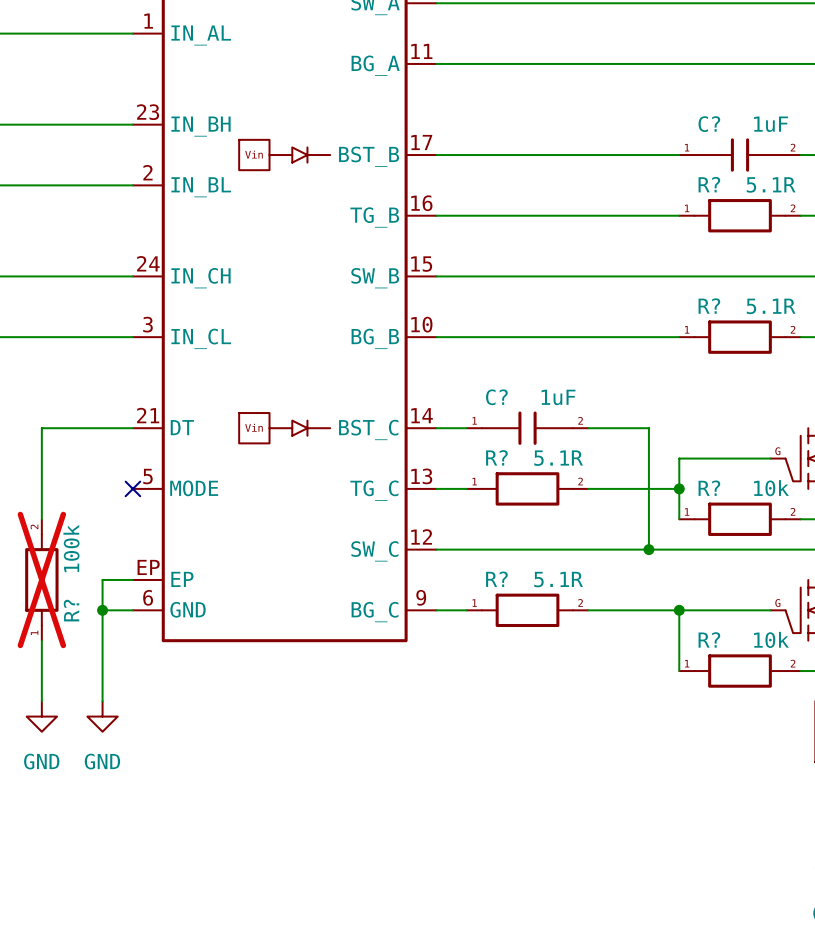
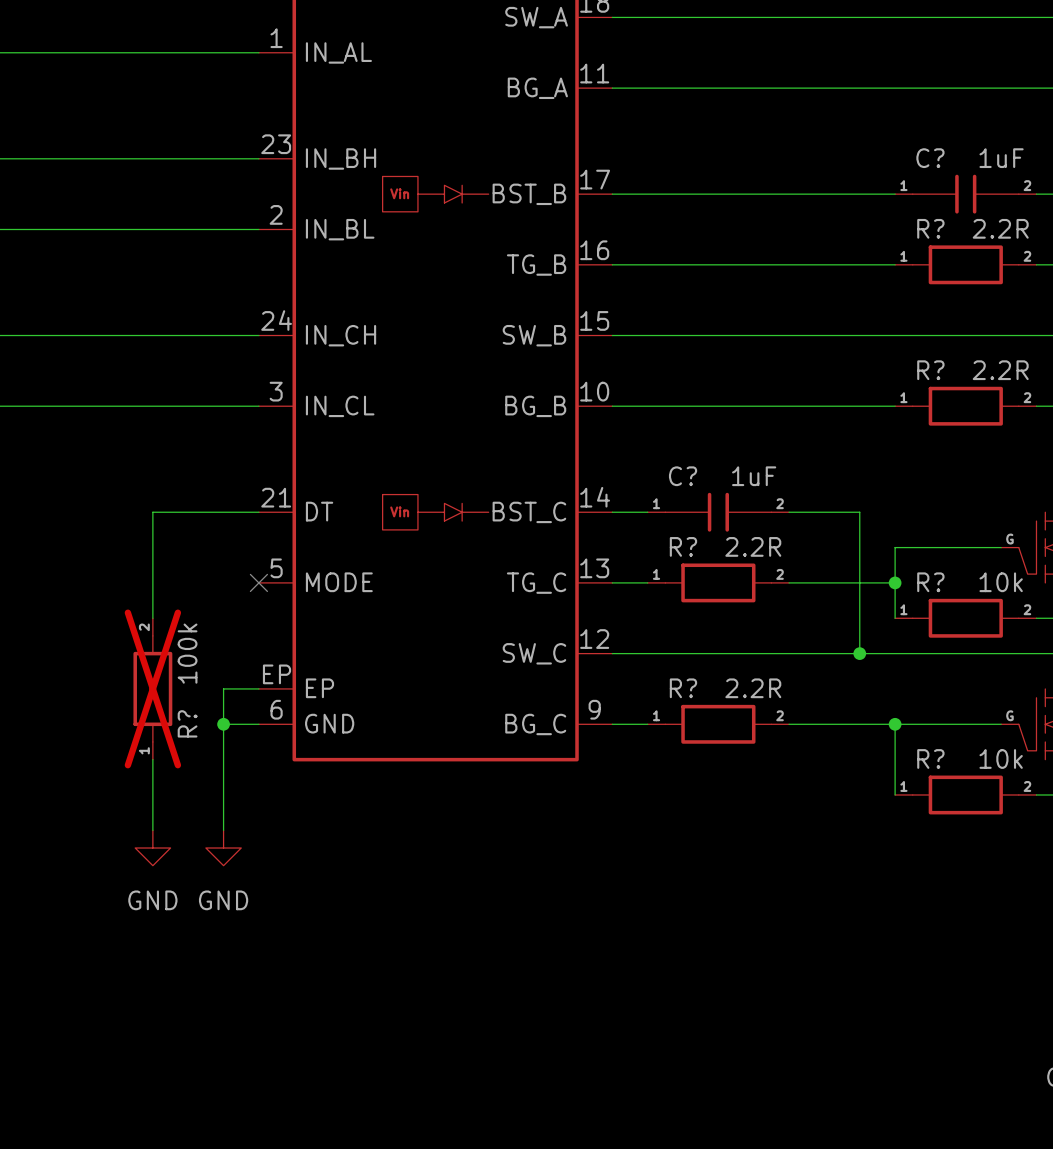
R? value: 5.1R (771, 184) -> 2.2R (1000, 228)
R? value: 5.1R (771, 306) -> 2.2R (1000, 370)
R? value: 5.1R (558, 458) -> 2.2R (753, 546)
R? value: 5.1R (558, 579) -> 2.2R (753, 688)

